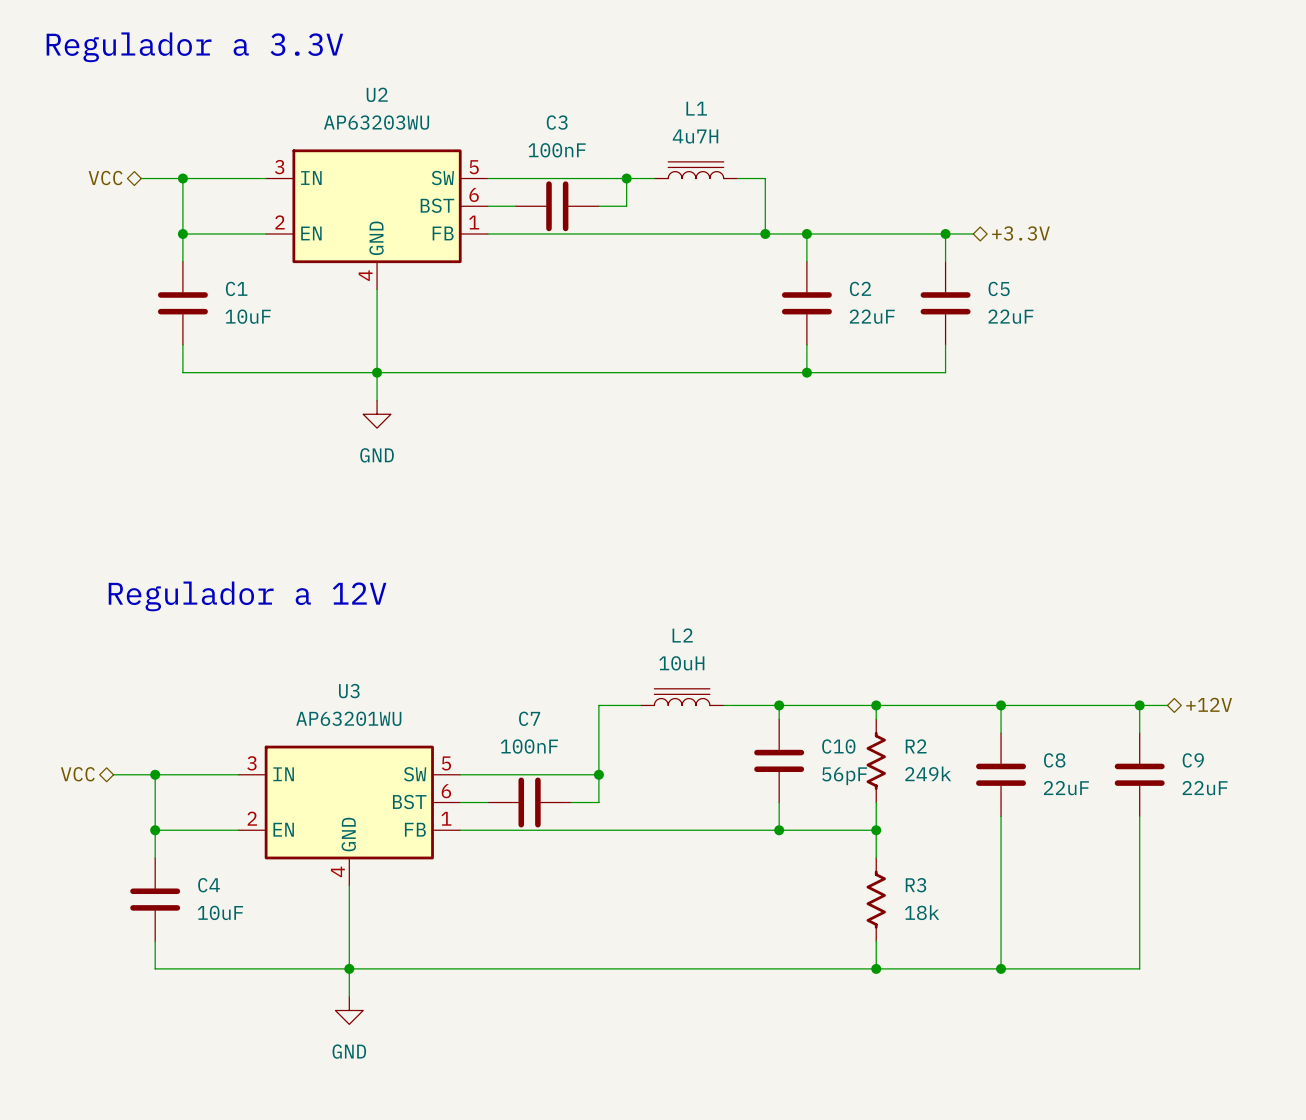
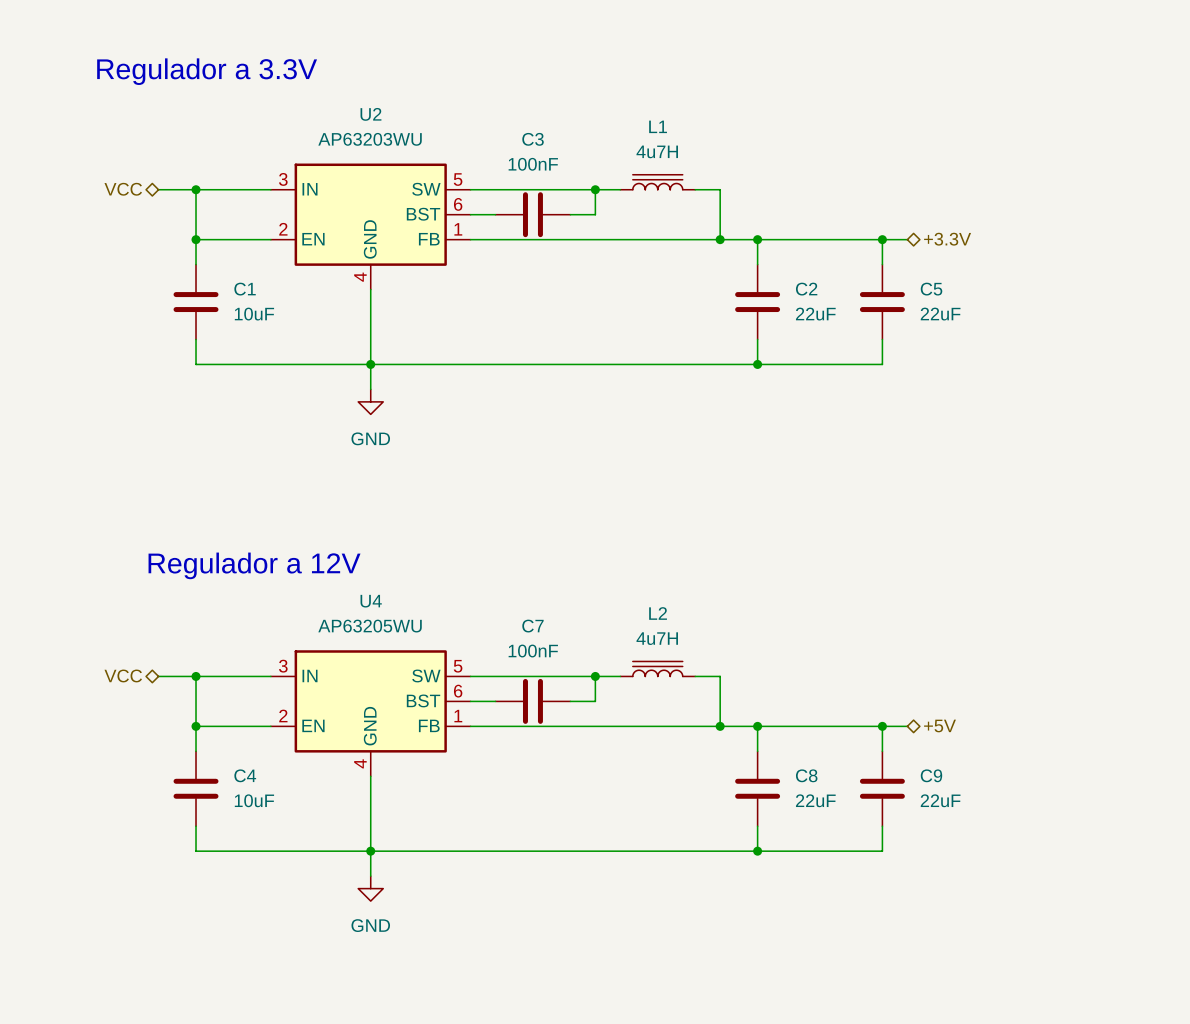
L2 value: 10uH (681, 663) -> 4u7H (657, 638)
L2 position: (682, 697) -> (657, 668)
hierarchical label: +12V (1209, 704) -> none
wire: (640, 705) (598, 705) (598, 802) (571, 802) -> none
wire: (723, 705) (1167, 705) -> none
wire: (779, 705) (779, 719) -> none
junction: (779, 705) -> none
wire: (876, 705) (876, 719) -> none
junction: (876, 705) -> none
wire: (1001, 705) (1001, 733) -> none
junction: (1001, 705) -> none
wire: (1139, 705) (1139, 733) -> (882, 726) (882, 751)
junction: (1139, 705) -> none
wire: none -> (158, 676) (270, 676)
junction: none -> (196, 676)
wire: none -> (470, 676) (620, 676)
wire: none -> (595, 676) (595, 701) (570, 701)
wire: none -> (695, 676) (720, 676) (720, 726)
U4: none -> AP63205WU (370, 713)
C10: 56pF (779, 760) -> none
R2: 249k (876, 760) -> none
hierarchical label position: VCC (77, 774) -> VCC (123, 675)
wire: (113, 774) (182, 774) -> none
wire: (155, 774) (155, 857) -> (196, 676) (196, 751)
junction position: (155, 774) -> (196, 726)
wire: none -> (570, 726) (907, 726)
junction position: (598, 774) -> (595, 676)
junction: none -> (720, 726)
junction: none -> (757, 726)
junction: none -> (882, 726)
C8 position: (1001, 774) -> (757, 788)
hierarchical label: none -> +5V (940, 725)
C9 position: (1139, 774) -> (882, 788)
wire: (460, 802) (487, 802) -> (470, 701) (495, 701)
C7 position: (529, 802) -> (532, 701)
wire: (779, 802) (779, 830) -> (757, 726) (757, 751)
wire: (876, 802) (876, 857) -> none
U3: AP63201WU (349, 815) -> none
wire: (1001, 816) (1001, 968) -> none
wire: (1139, 816) (1139, 968) (155, 968) (155, 941) -> none
wire: (155, 830) (238, 830) -> none
junction: (155, 830) -> none
wire: (460, 830) (876, 830) -> none
junction: (779, 830) -> none
junction: (876, 830) -> none
wire: none -> (196, 826) (196, 851) (882, 851) (882, 826)
wire: (349, 885) (349, 996) -> (370, 776) (370, 876)
C4 position: (155, 899) -> (196, 788)
R3: 18k (876, 899) -> none
junction: none -> (757, 851)
wire: (876, 941) (876, 968) -> (757, 826) (757, 851)
junction position: (349, 968) -> (370, 851)
junction: (876, 968) -> none
junction: (1001, 968) -> none
power symbol position: GND (349, 1010) -> GND (370, 888)

